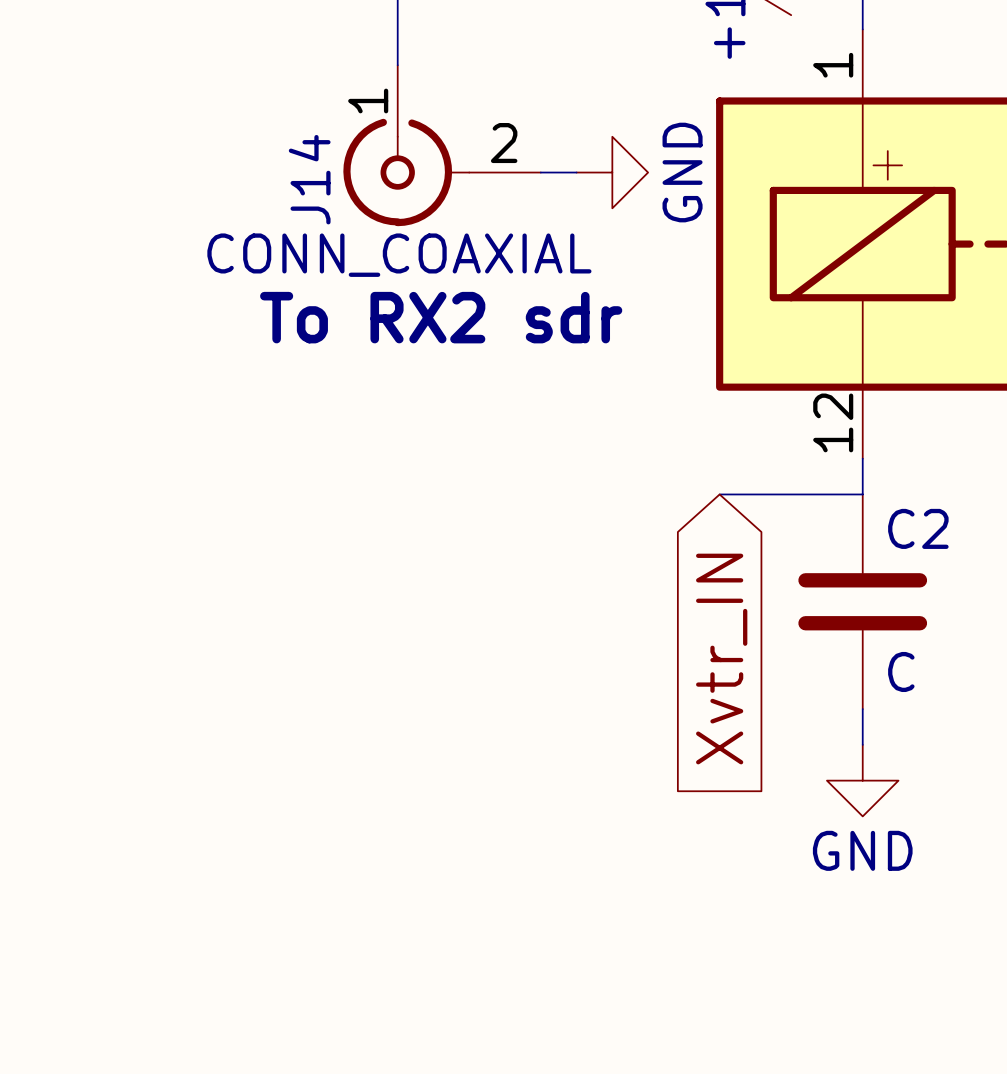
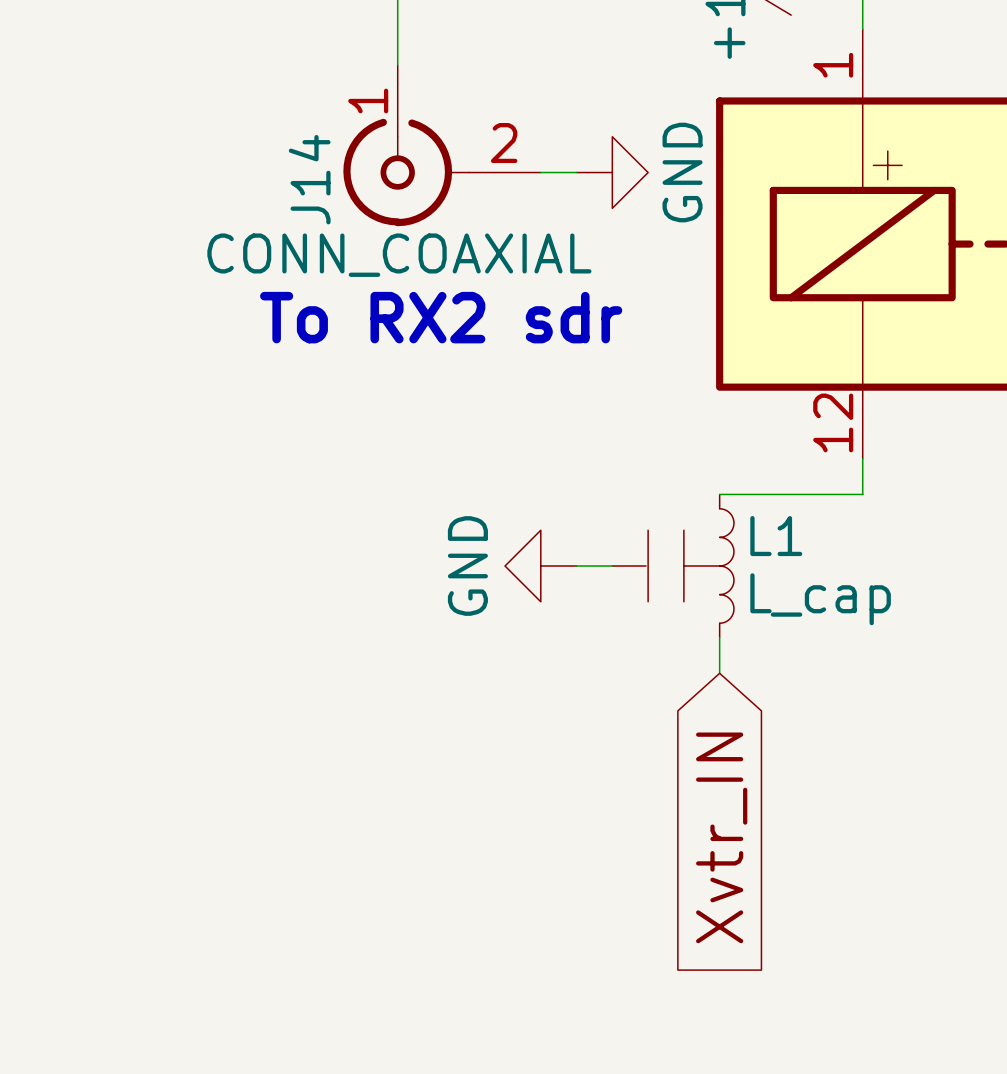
wire: none -> (576, 566) (612, 566)
L1: none -> L_cap (673, 566)
C2: C (862, 601) -> none
global label position: Xvtr_IN (721, 659) -> Xvtr_IN (721, 837)
wire: (862, 709) (862, 744) -> (719, 637) (719, 673)
power symbol rotation: 0° (862, 780) -> 90° clockwise (540, 566)
power symbol position: GND (862, 780) -> GND (540, 566)

